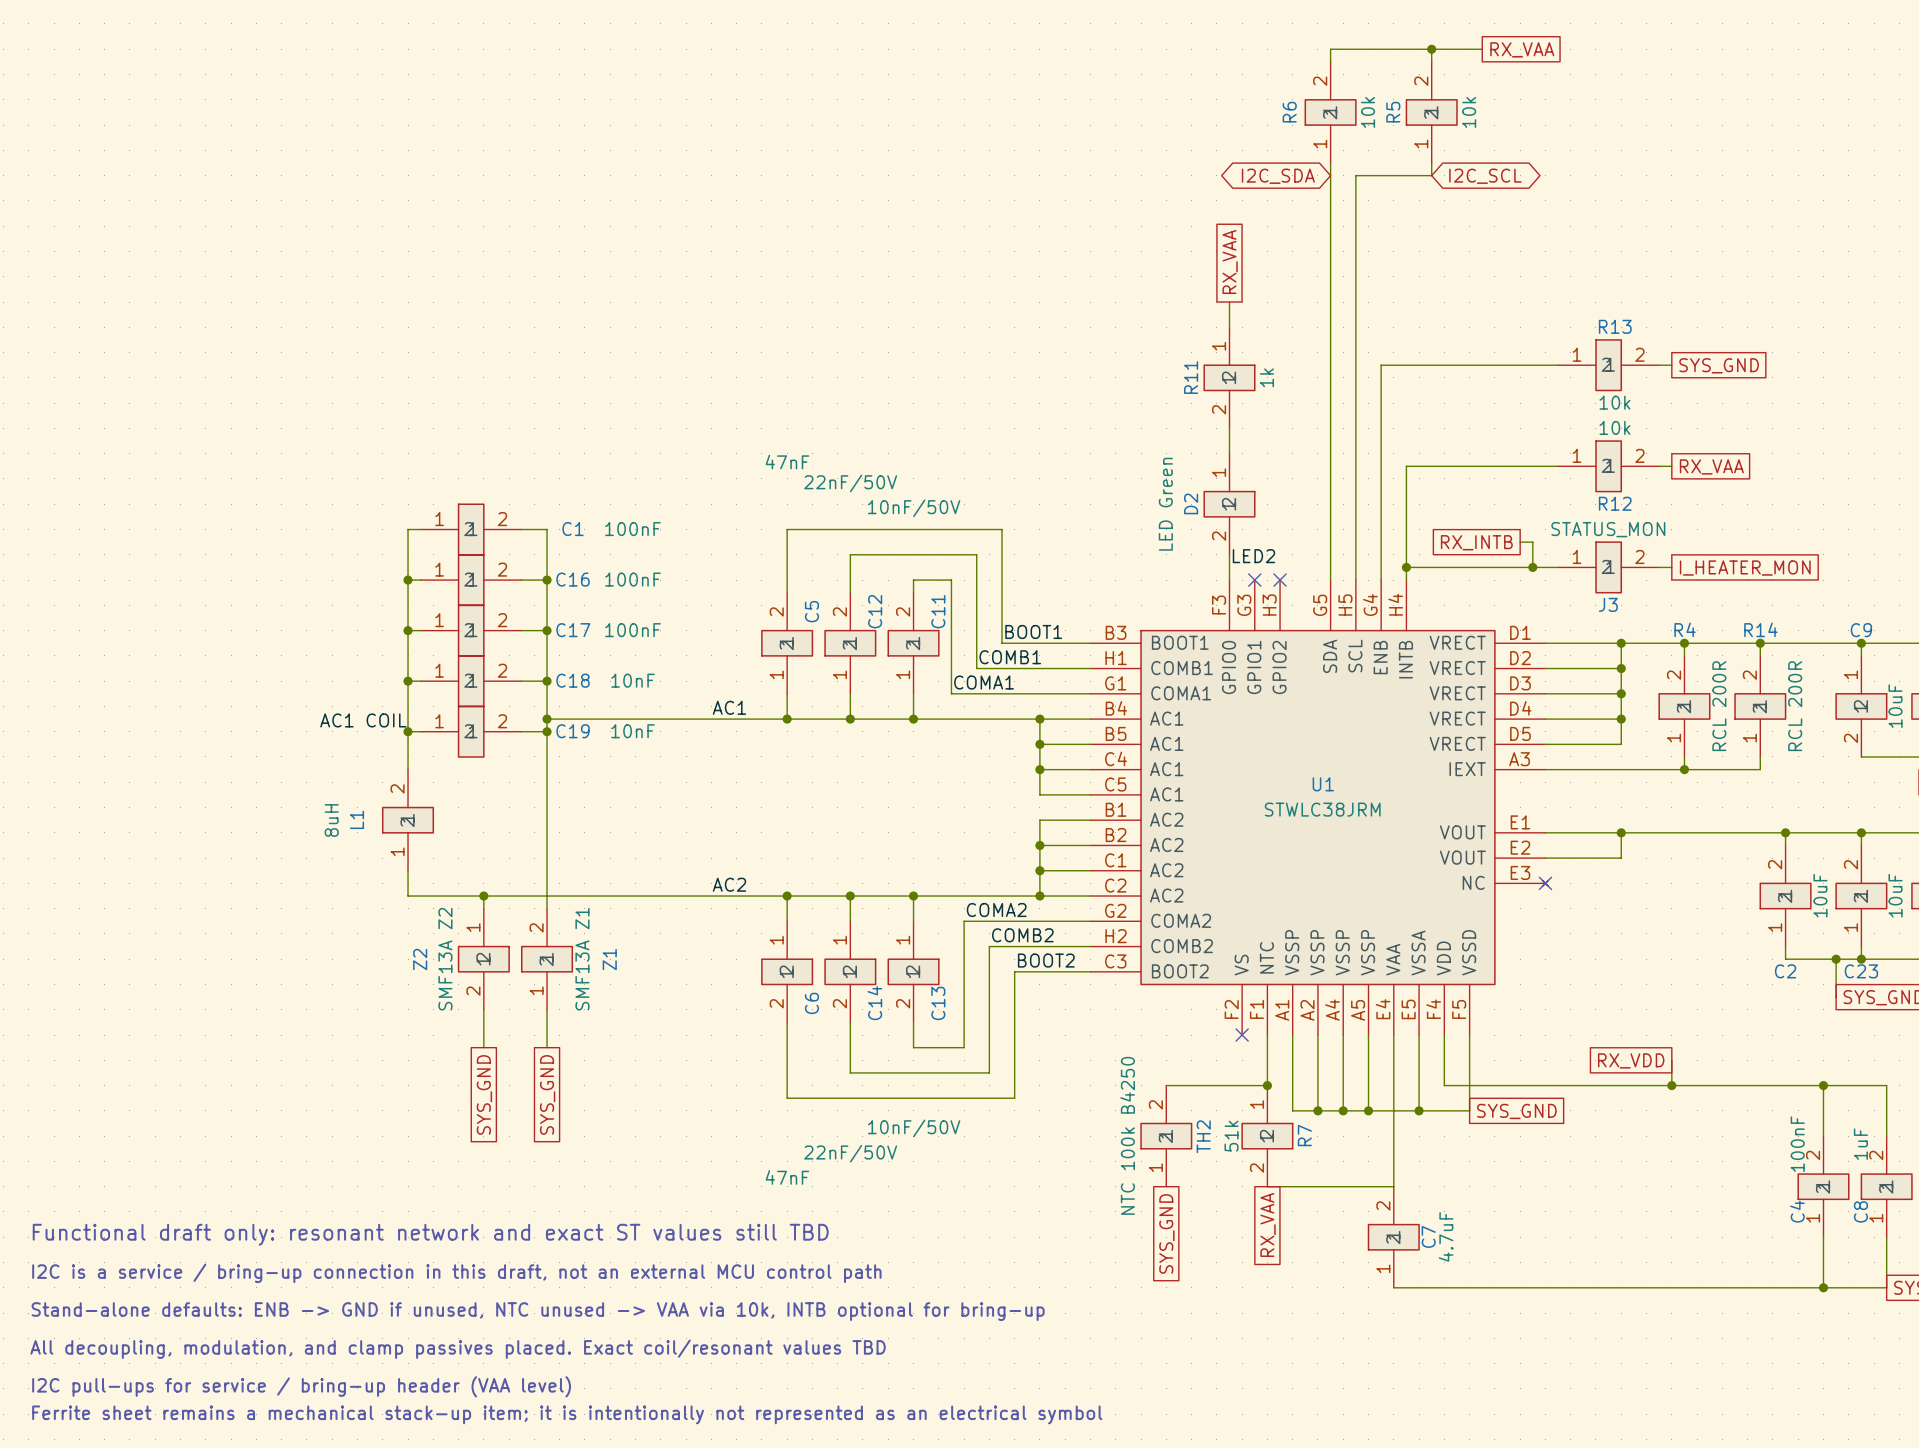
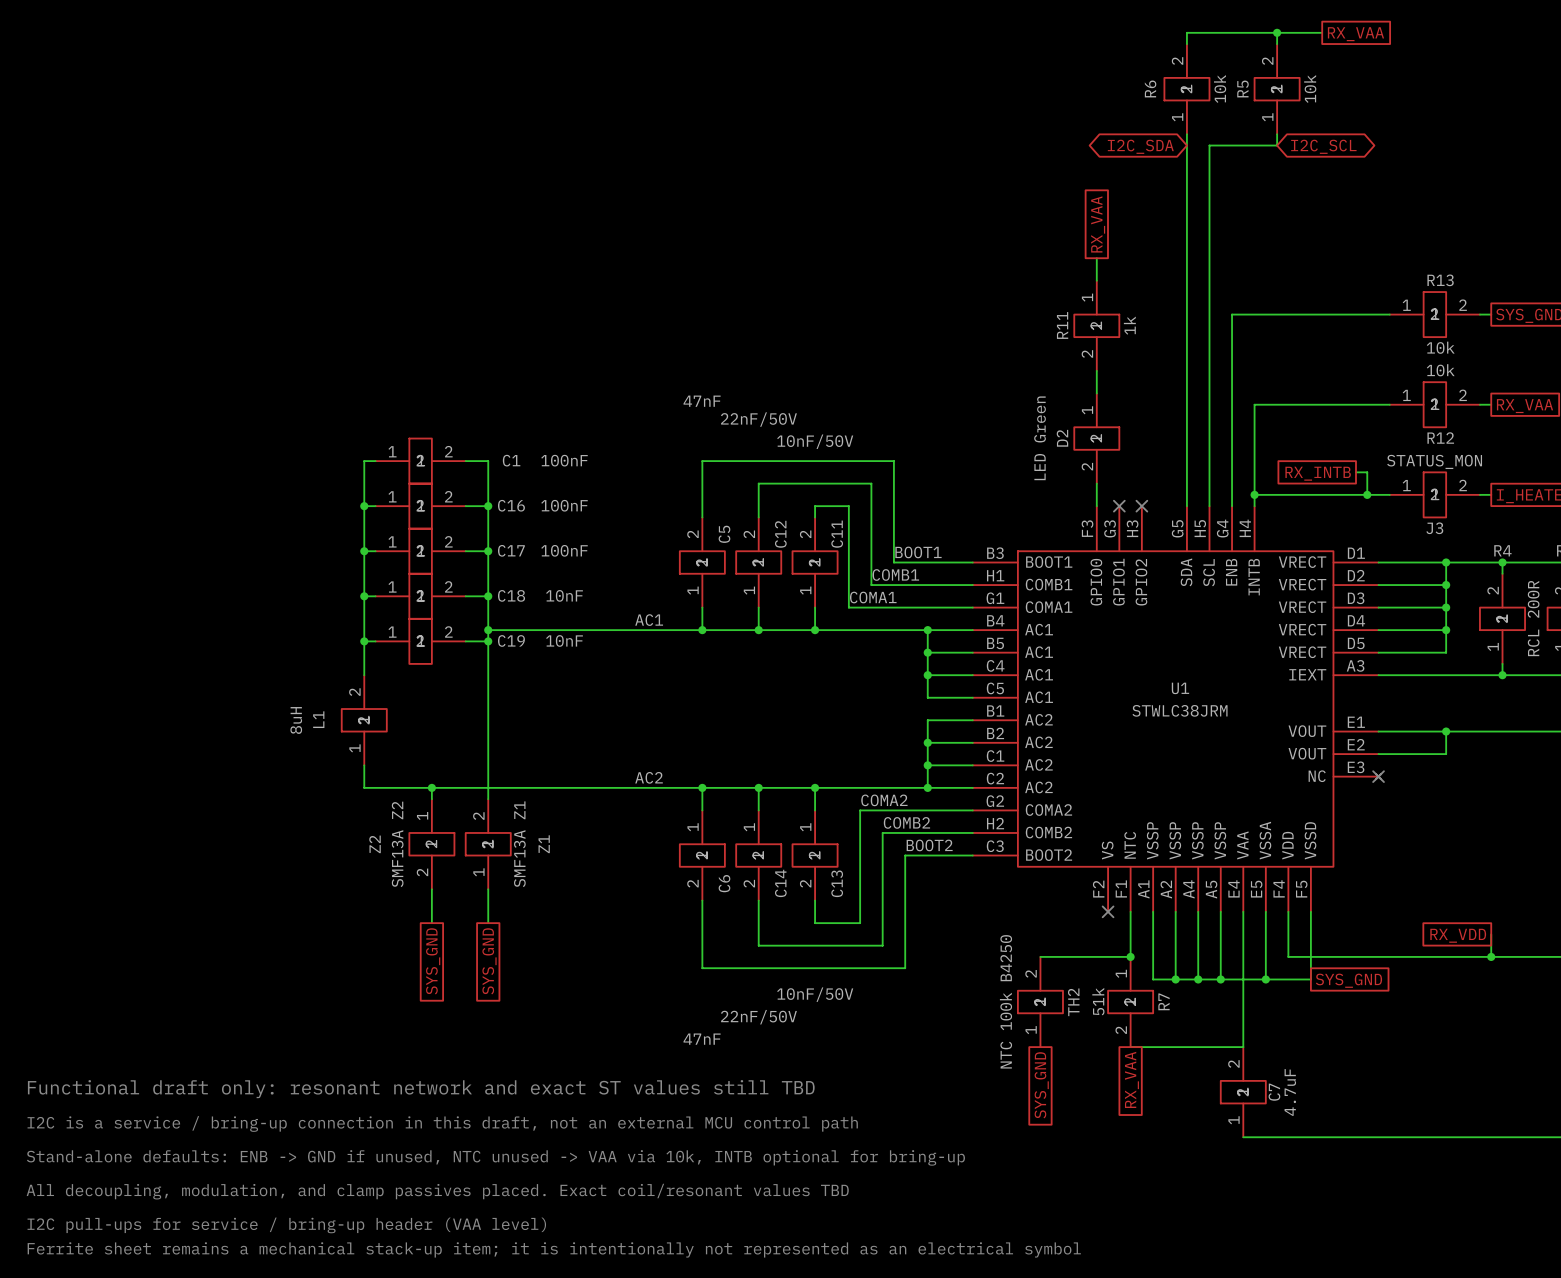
label: LED2 (1253, 556) -> none
label: AC1 COIL (363, 720) -> none

